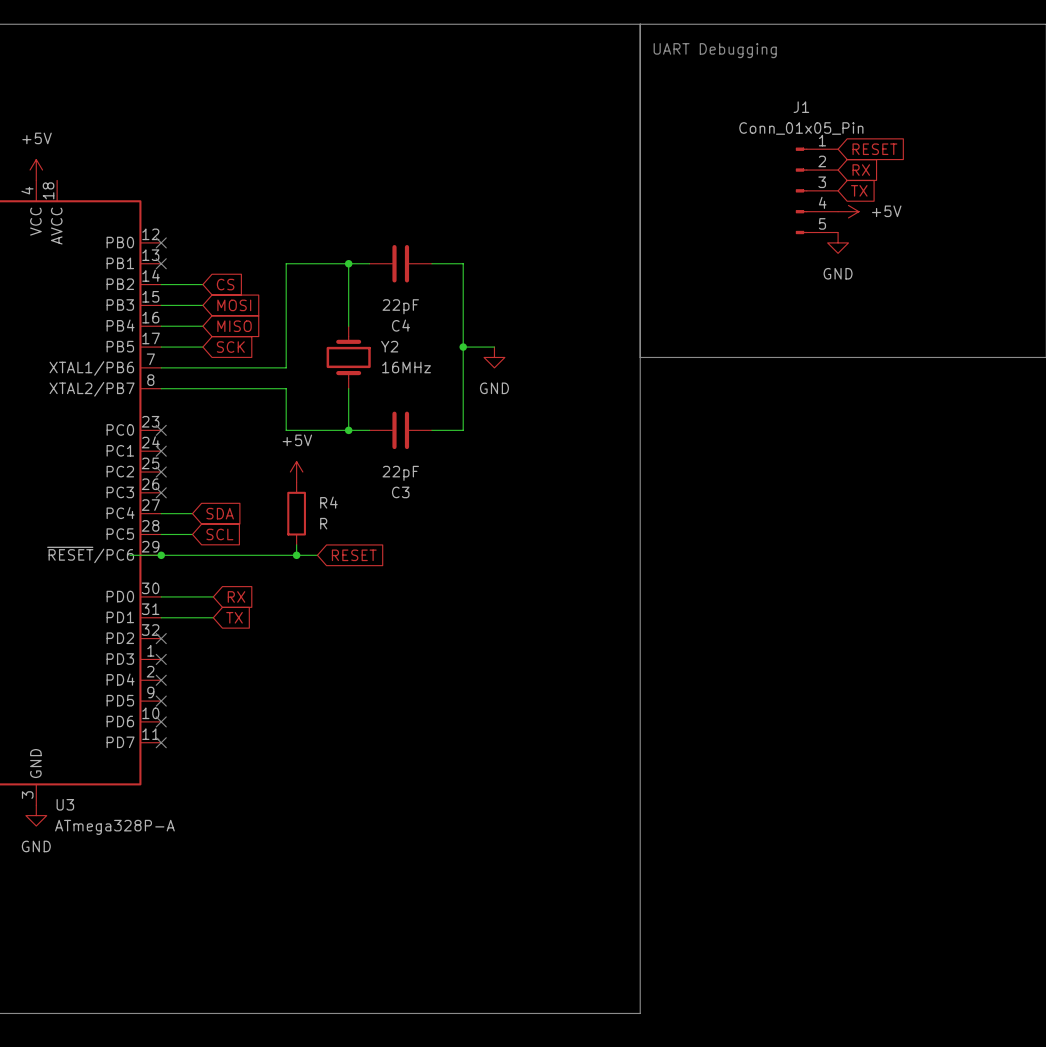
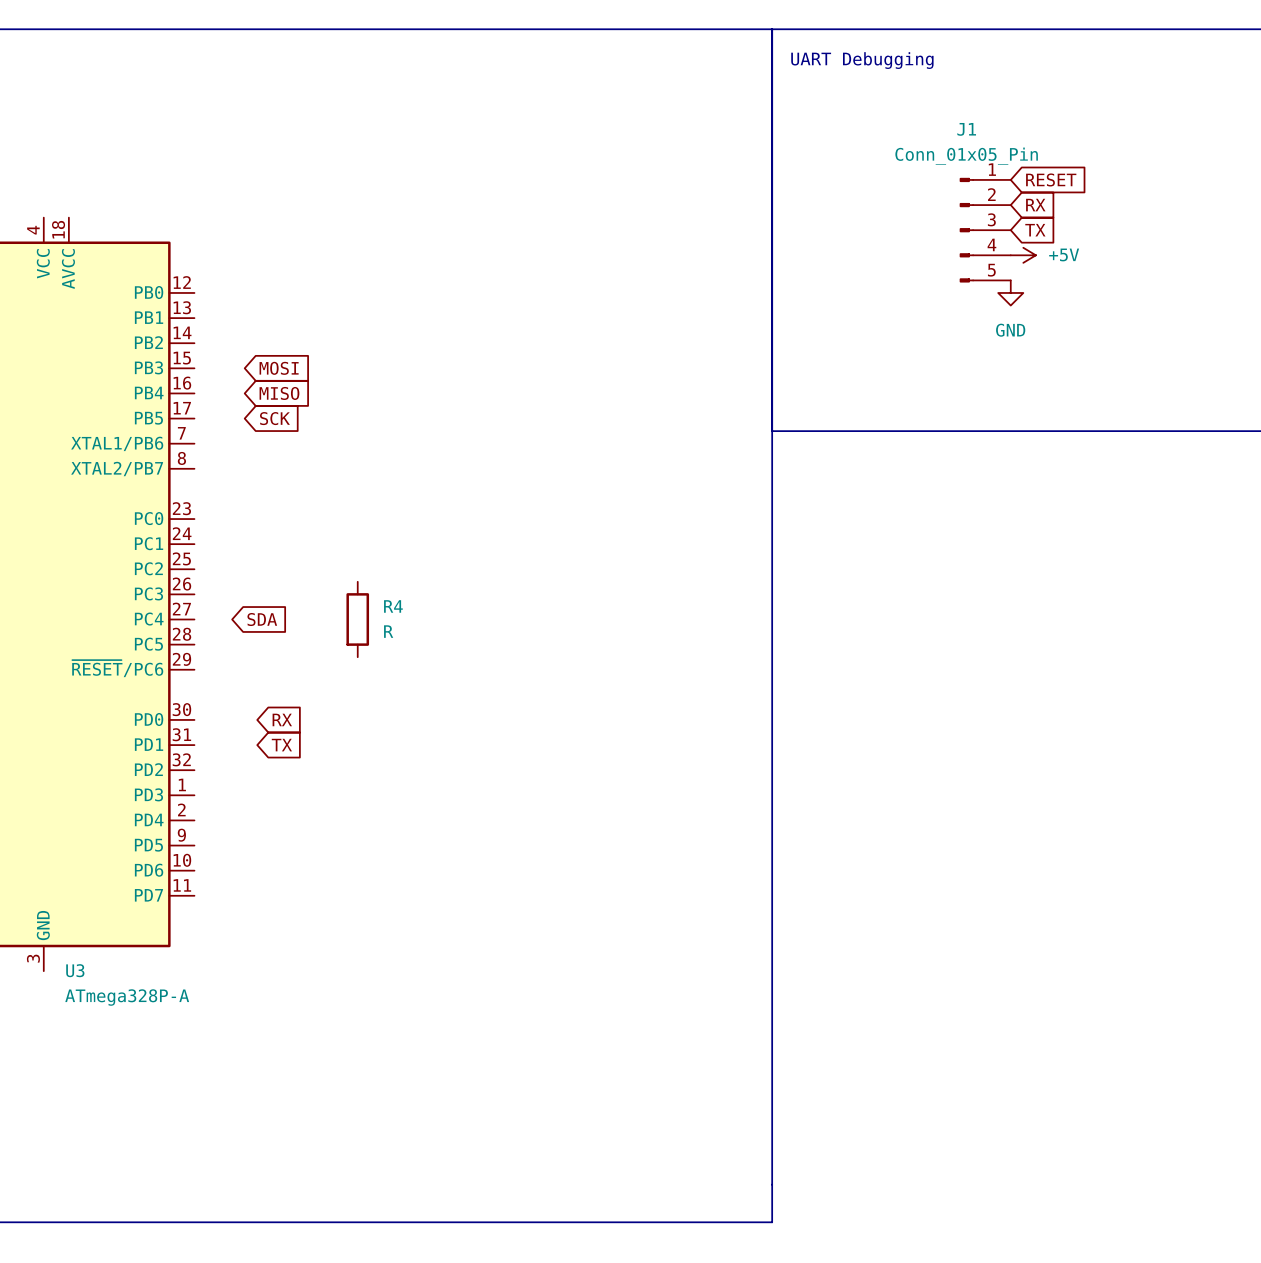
power symbol: +5V (36, 170) -> none
no-connect mark: (161, 242) -> none
no-connect mark: (161, 263) -> none
wire: (348, 263) (348, 326) -> none
junction: (348, 263) -> none
wire: (369, 263) (286, 263) (286, 367) (161, 367) -> none
C4: 22pF (400, 263) -> none
wire: (431, 263) (463, 263) (463, 430) (431, 430) -> none
wire: (161, 284) (202, 284) -> none
global label: CS (225, 284) -> none
wire: (161, 305) (202, 305) -> none
wire: (161, 326) (202, 326) -> none
wire: (161, 347) (202, 347) -> none
wire: (463, 347) (494, 347) -> none
junction: (463, 347) -> none
Y2: 16MHz (348, 357) -> none
power symbol: GND (494, 357) -> none
wire: (161, 388) (286, 388) (286, 430) (369, 430) -> none
wire: (348, 388) (348, 430) -> none
no-connect mark: (161, 430) -> none
junction: (348, 430) -> none
C3: 22pF (400, 430) -> none
no-connect mark: (161, 451) -> none
no-connect mark: (161, 472) -> none
power symbol: +5V (296, 472) -> none
no-connect mark: (161, 492) -> none
wire: (161, 513) (192, 513) -> none
wire: (161, 534) (192, 534) -> none
global label: SCL (219, 534) -> none
wire: (296, 544) (296, 555) -> none
wire: (130, 555) (317, 555) -> none
junction: (161, 555) -> none
junction: (296, 555) -> none
global label: RESET (354, 555) -> none
wire: (161, 596) (213, 596) -> none
wire: (161, 617) (213, 617) -> none
no-connect mark: (161, 638) -> none
no-connect mark: (161, 659) -> none
no-connect mark: (161, 680) -> none
no-connect mark: (161, 701) -> none
no-connect mark: (161, 721) -> none
no-connect mark: (161, 742) -> none
power symbol: GND (36, 815) -> none

